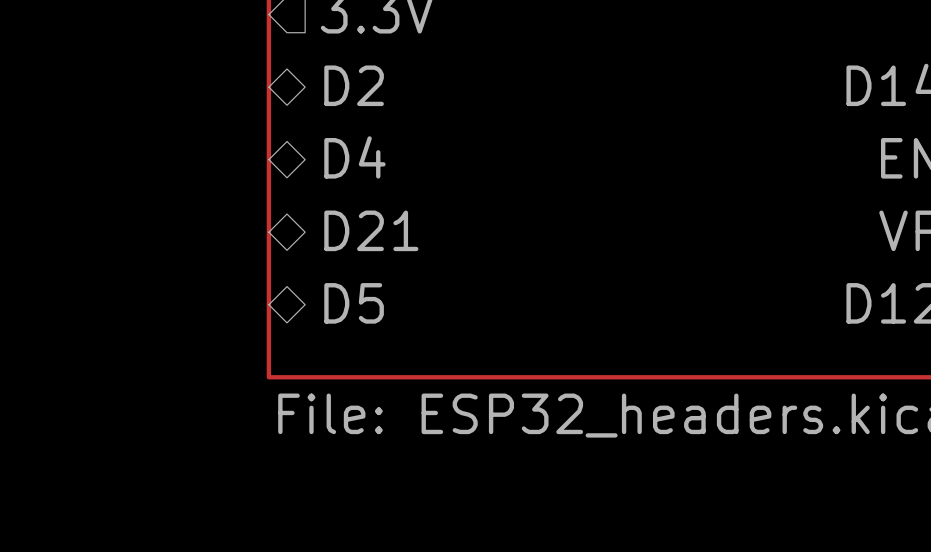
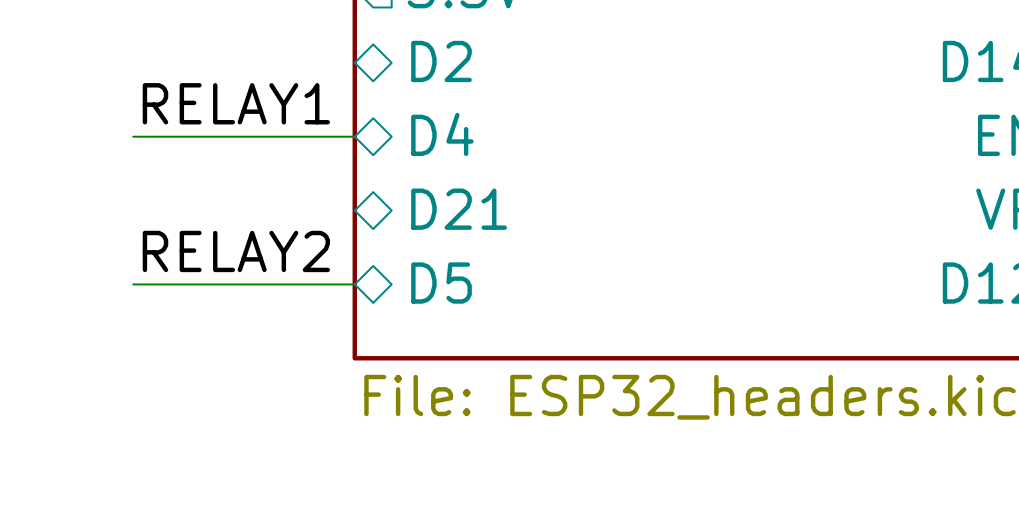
label: none -> RELAY1 (236, 103)
wire: none -> (133, 136) (354, 136)
label: none -> RELAY2 (236, 251)
wire: none -> (133, 284) (354, 284)

